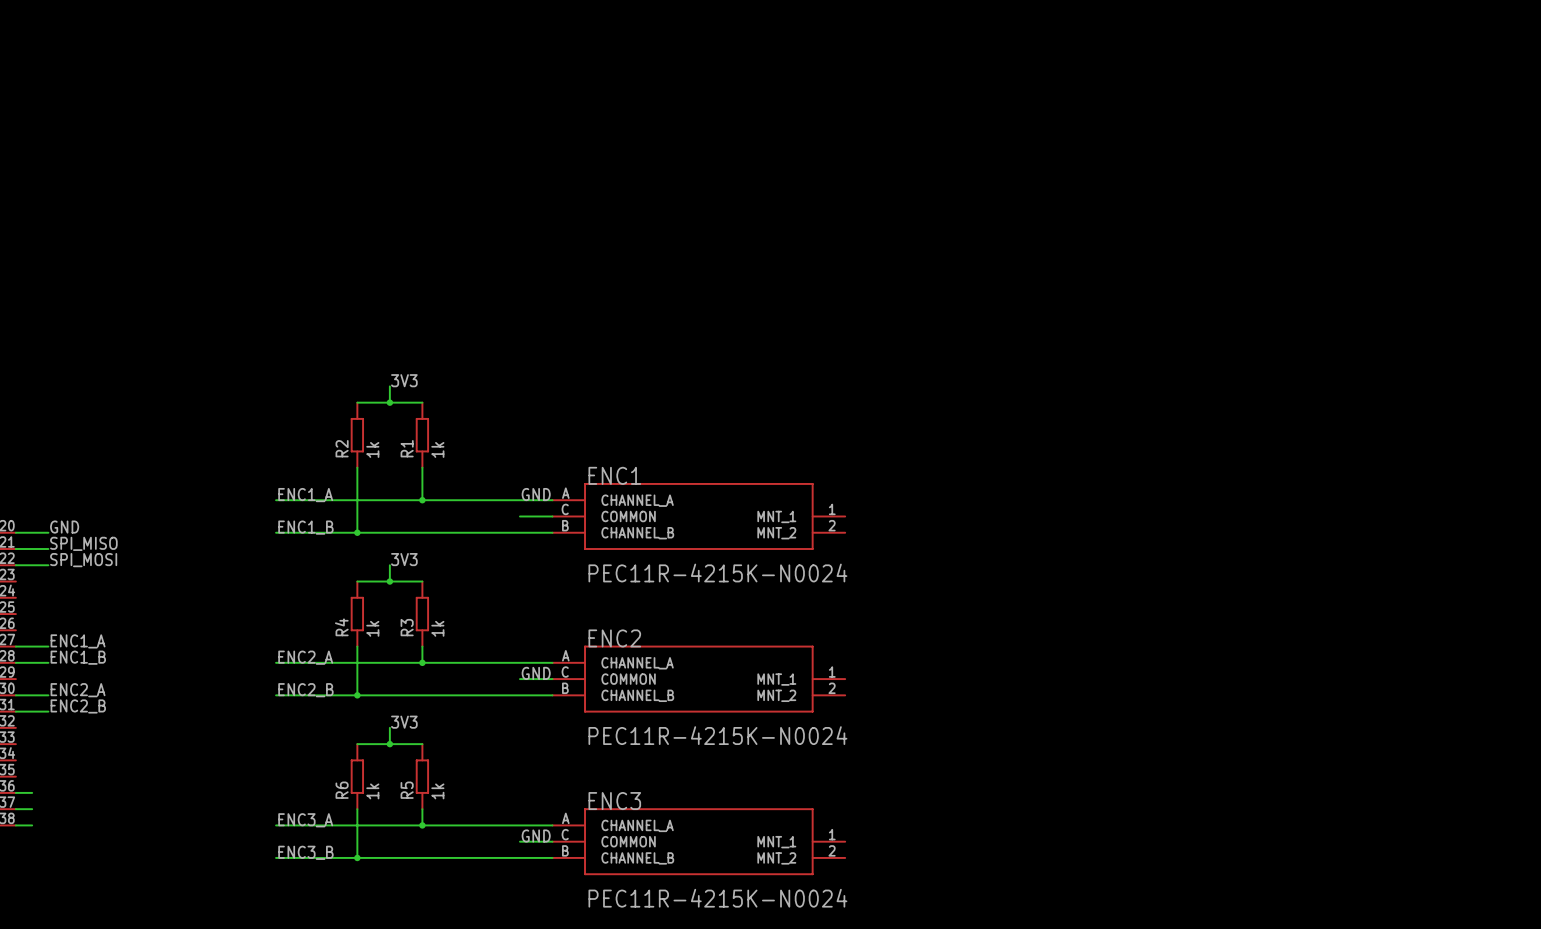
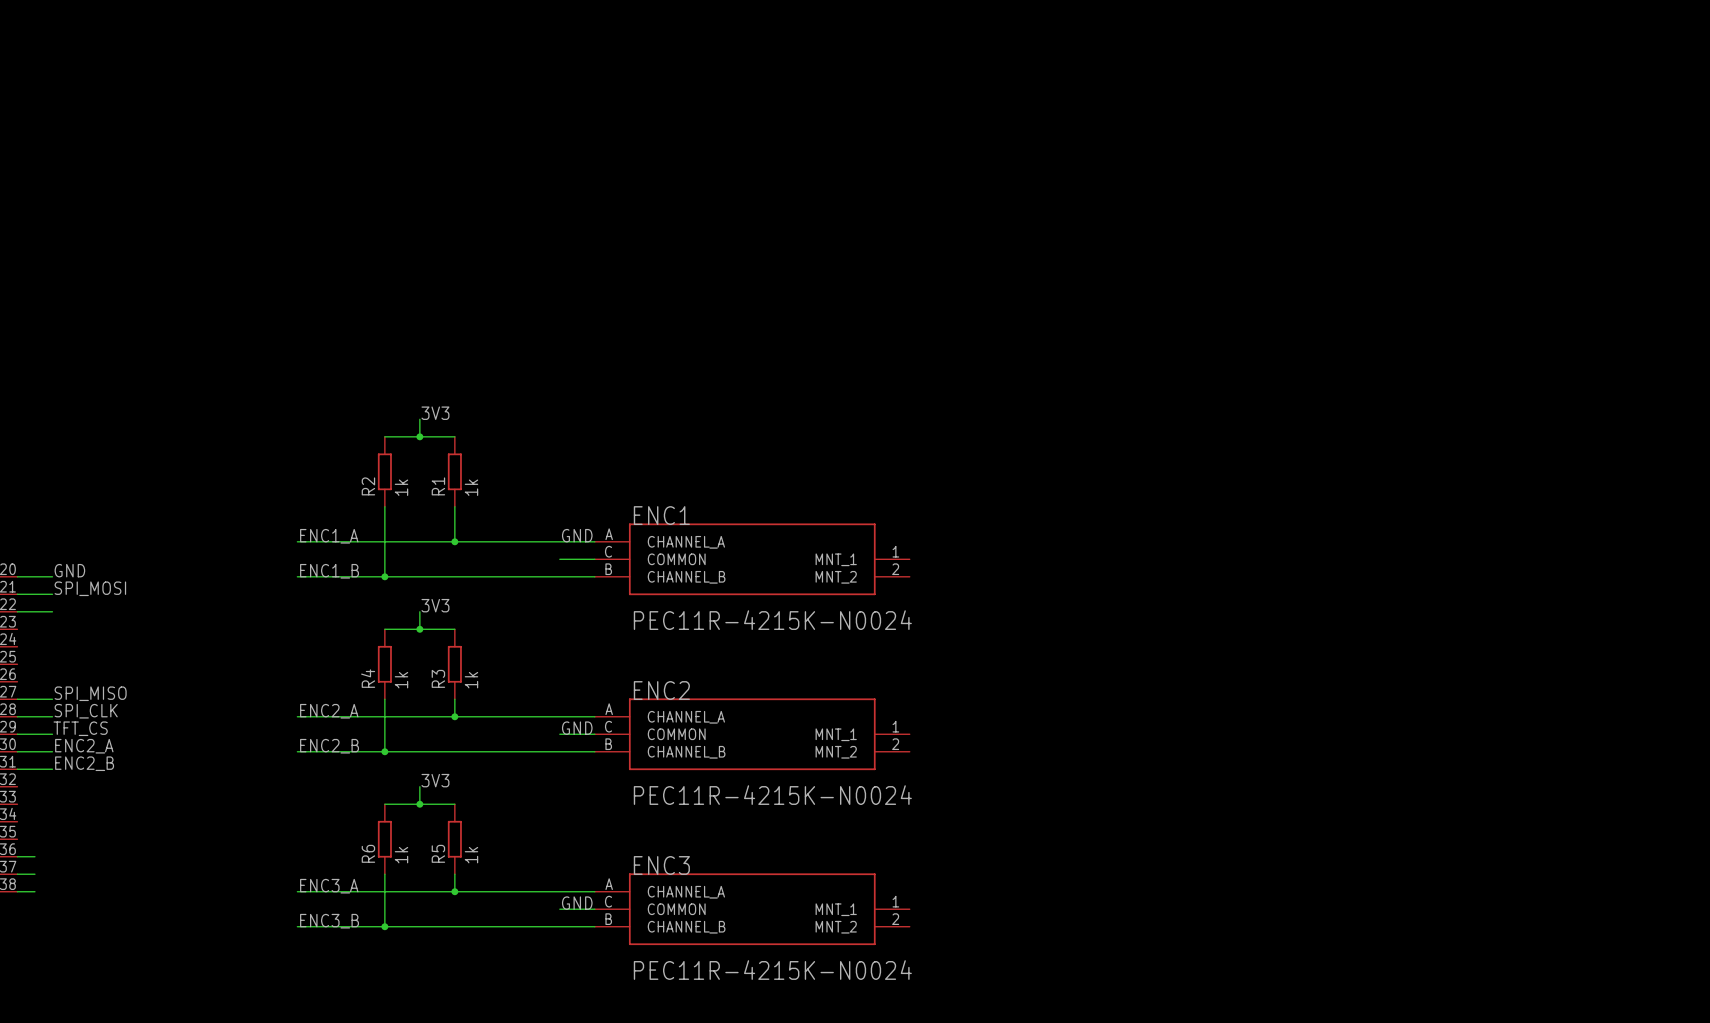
label: SPI_MISO (83, 543) -> SPI_MOSI (90, 588)
label: SPI_MOSI (83, 560) -> none
label: ENC1_A (78, 641) -> SPI_MISO (90, 693)
label: ENC1_B (78, 657) -> SPI_CLK (86, 711)
label: none -> TFT_CS (80, 728)
wire: none -> (17, 734) (52, 734)

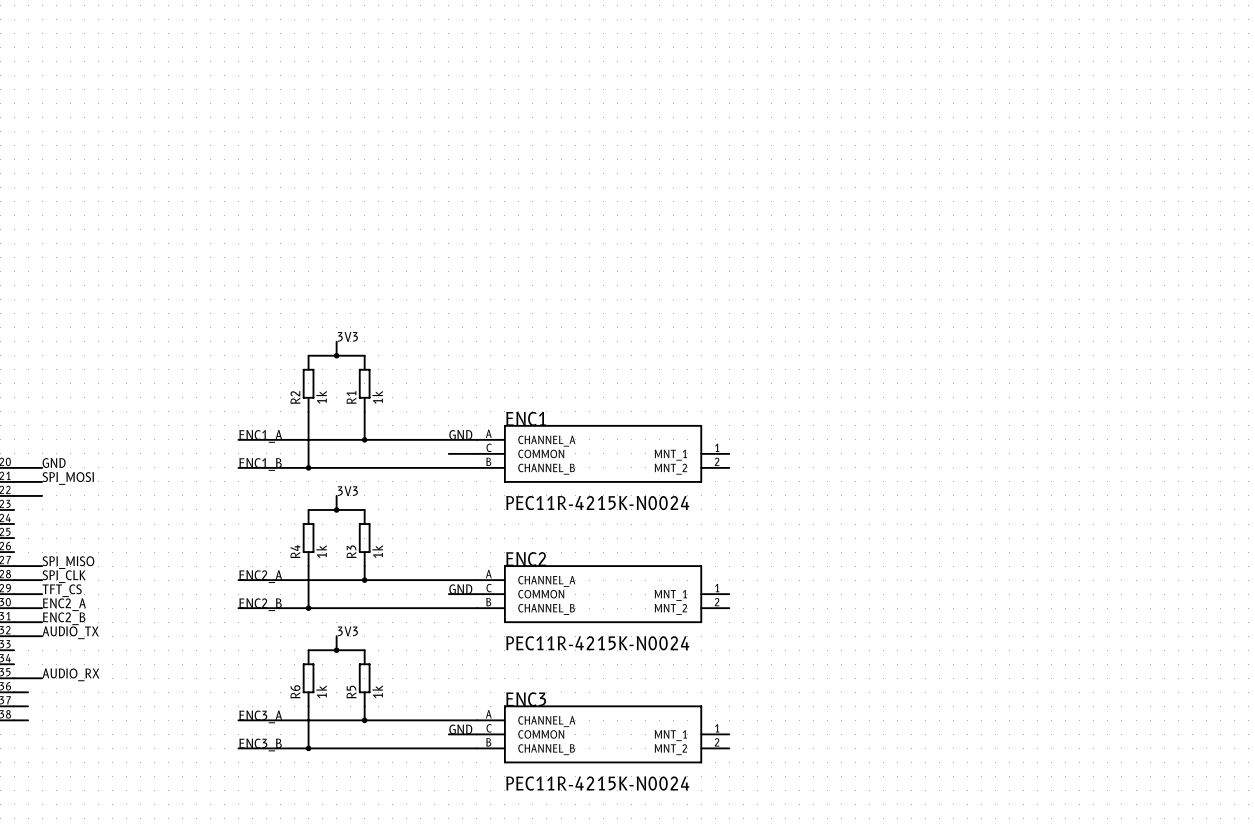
label: none -> AUDIO_TX (70, 632)
wire: none -> (14, 636) (42, 636)
label: none -> AUDIO_RX (70, 674)
wire: none -> (14, 678) (42, 678)

